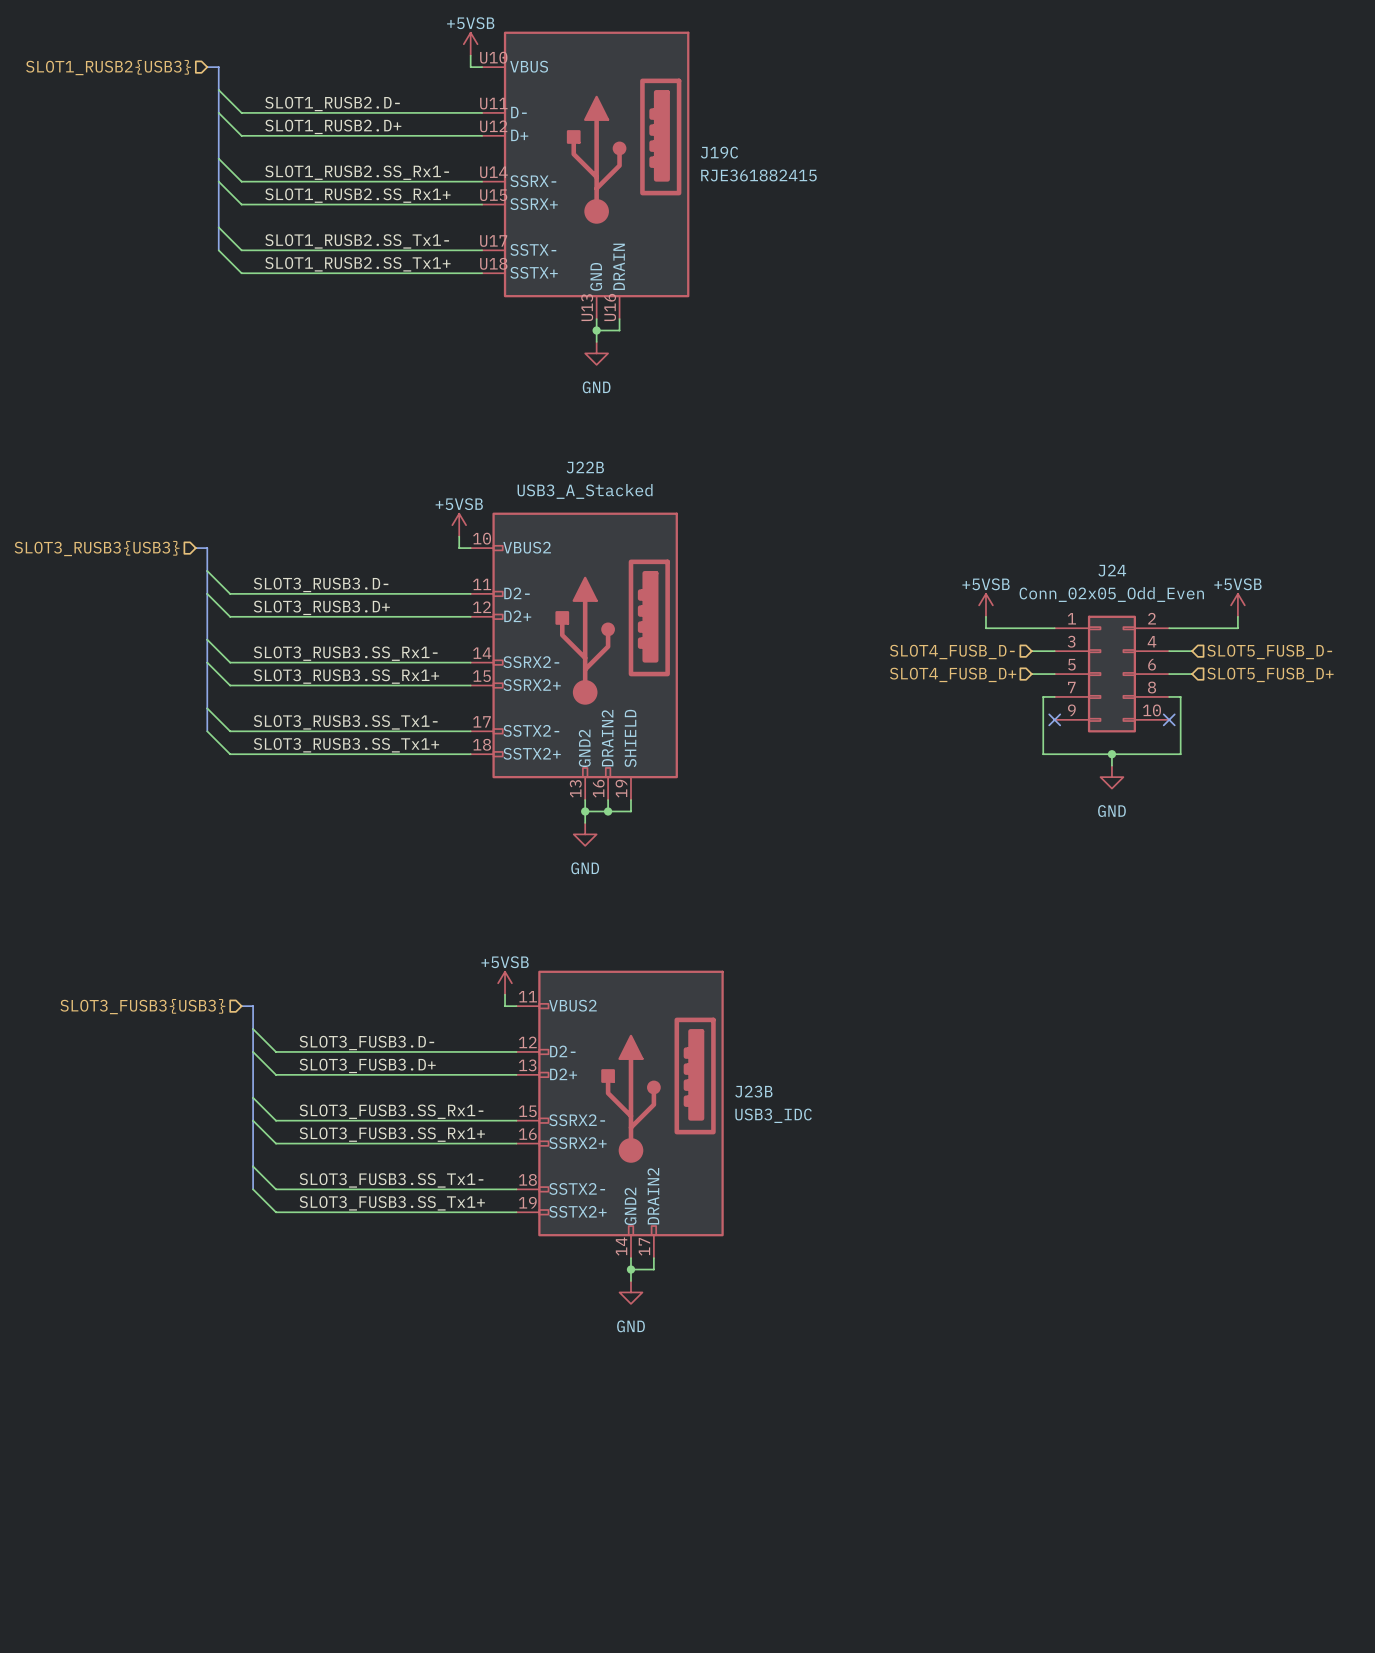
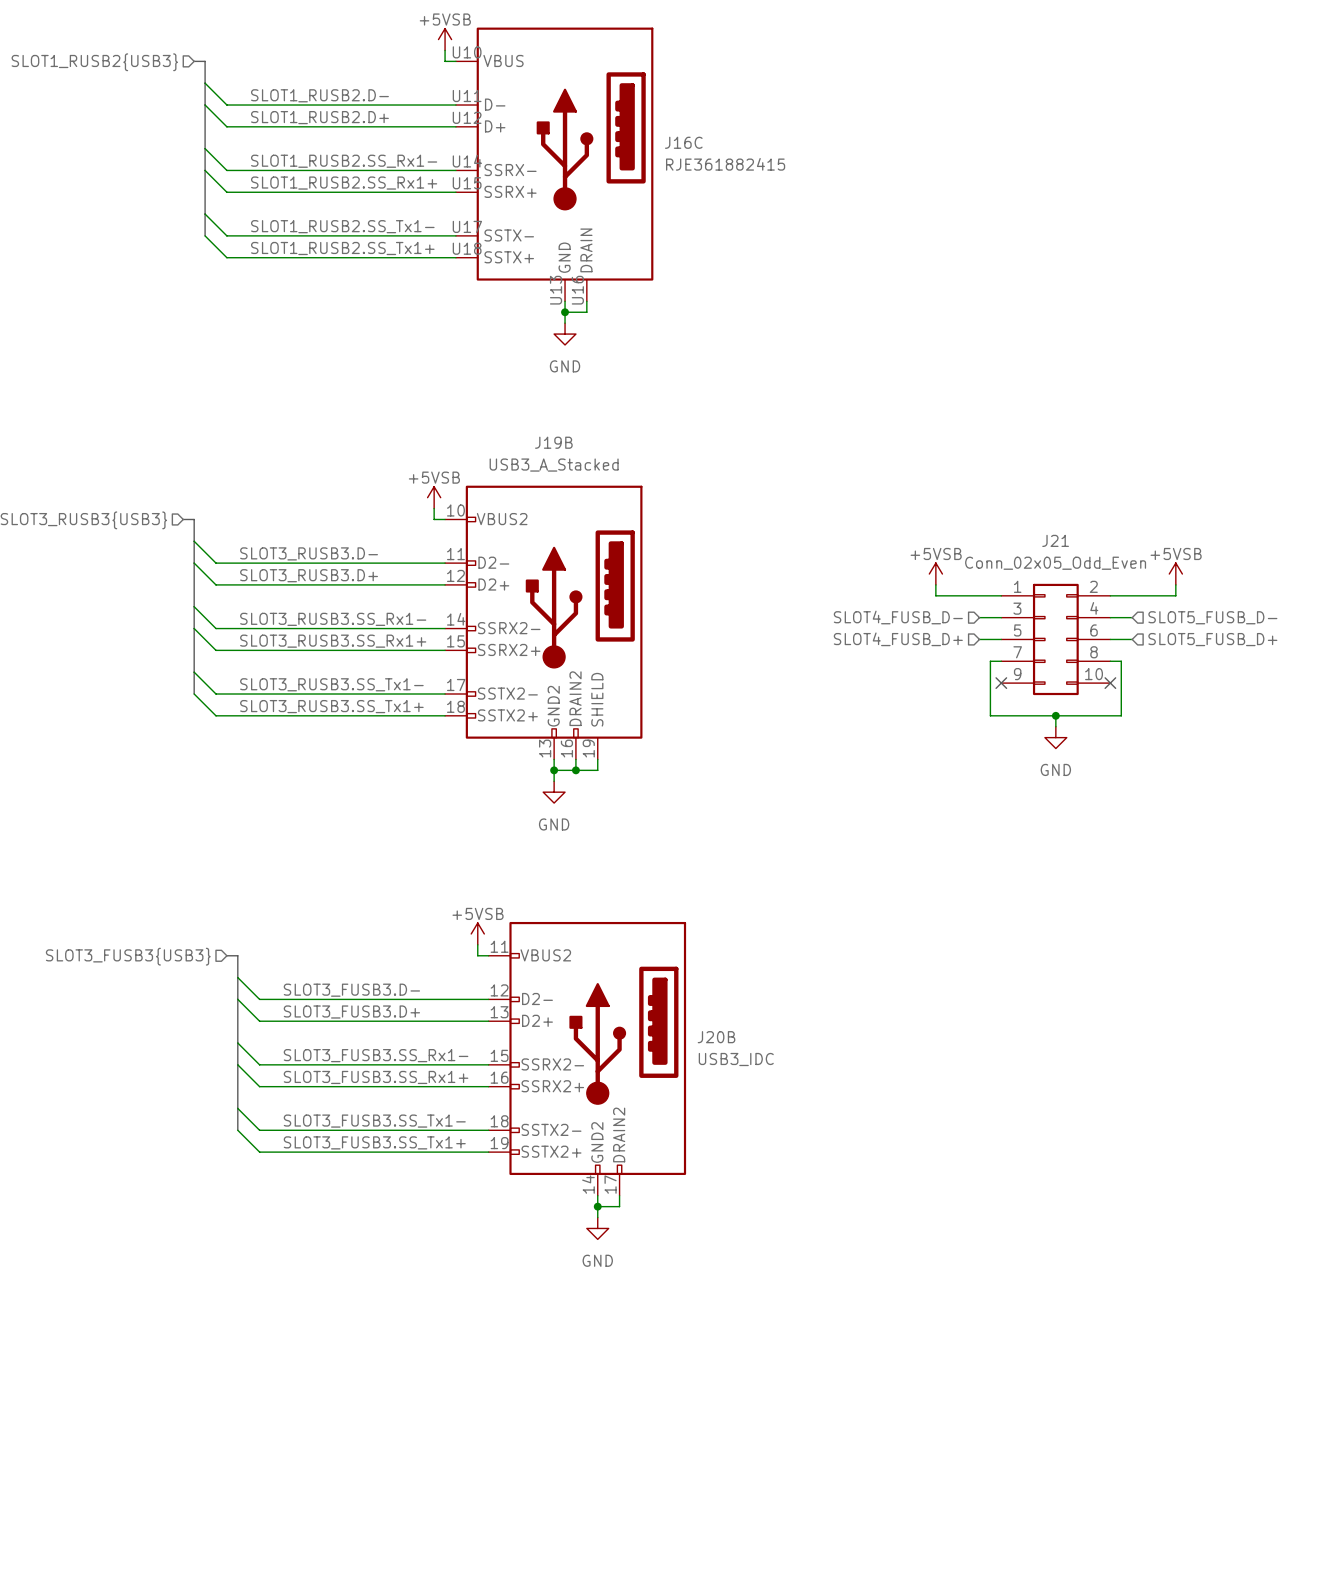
J19C name: J19C (719, 152) -> J16C (683, 142)
J22B name: J22B (585, 467) -> J19B (553, 442)
J24 name: J24 (1112, 570) -> J21 (1055, 540)
J23B name: J23B (753, 1091) -> J20B (716, 1037)

